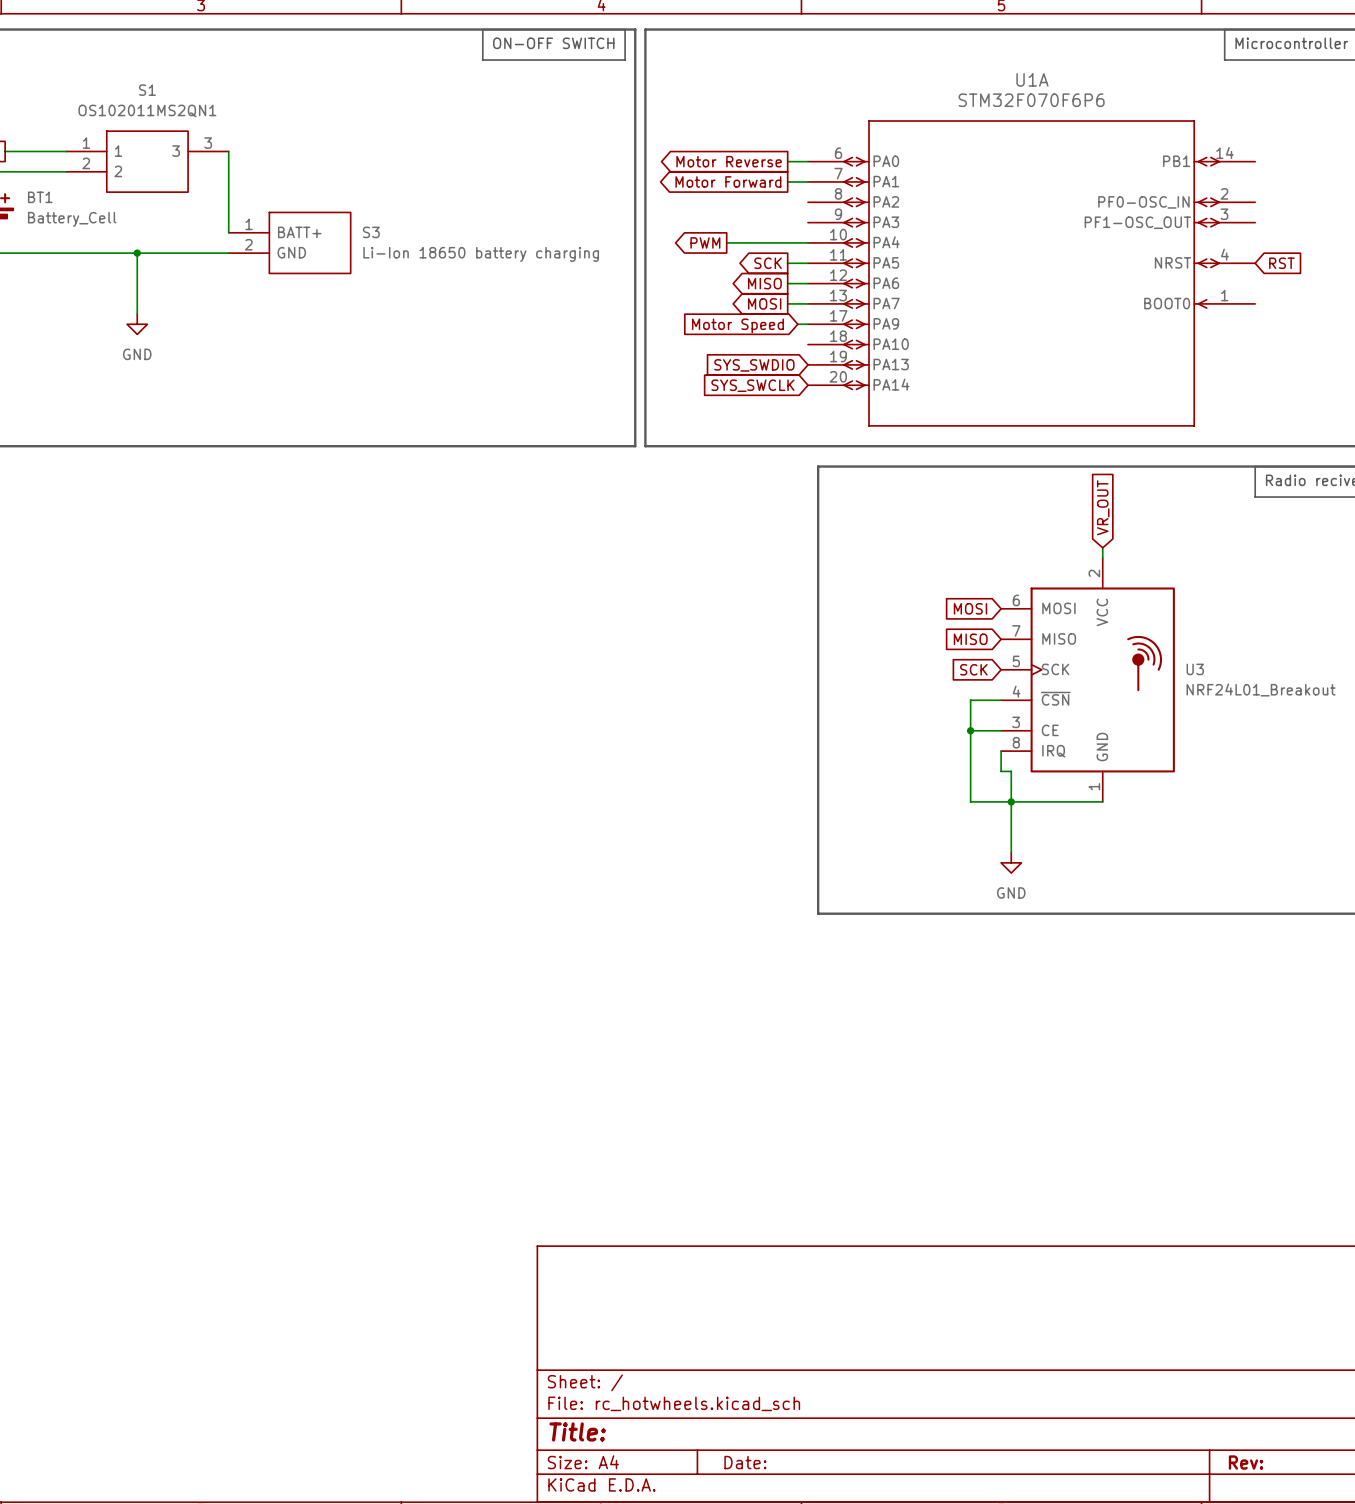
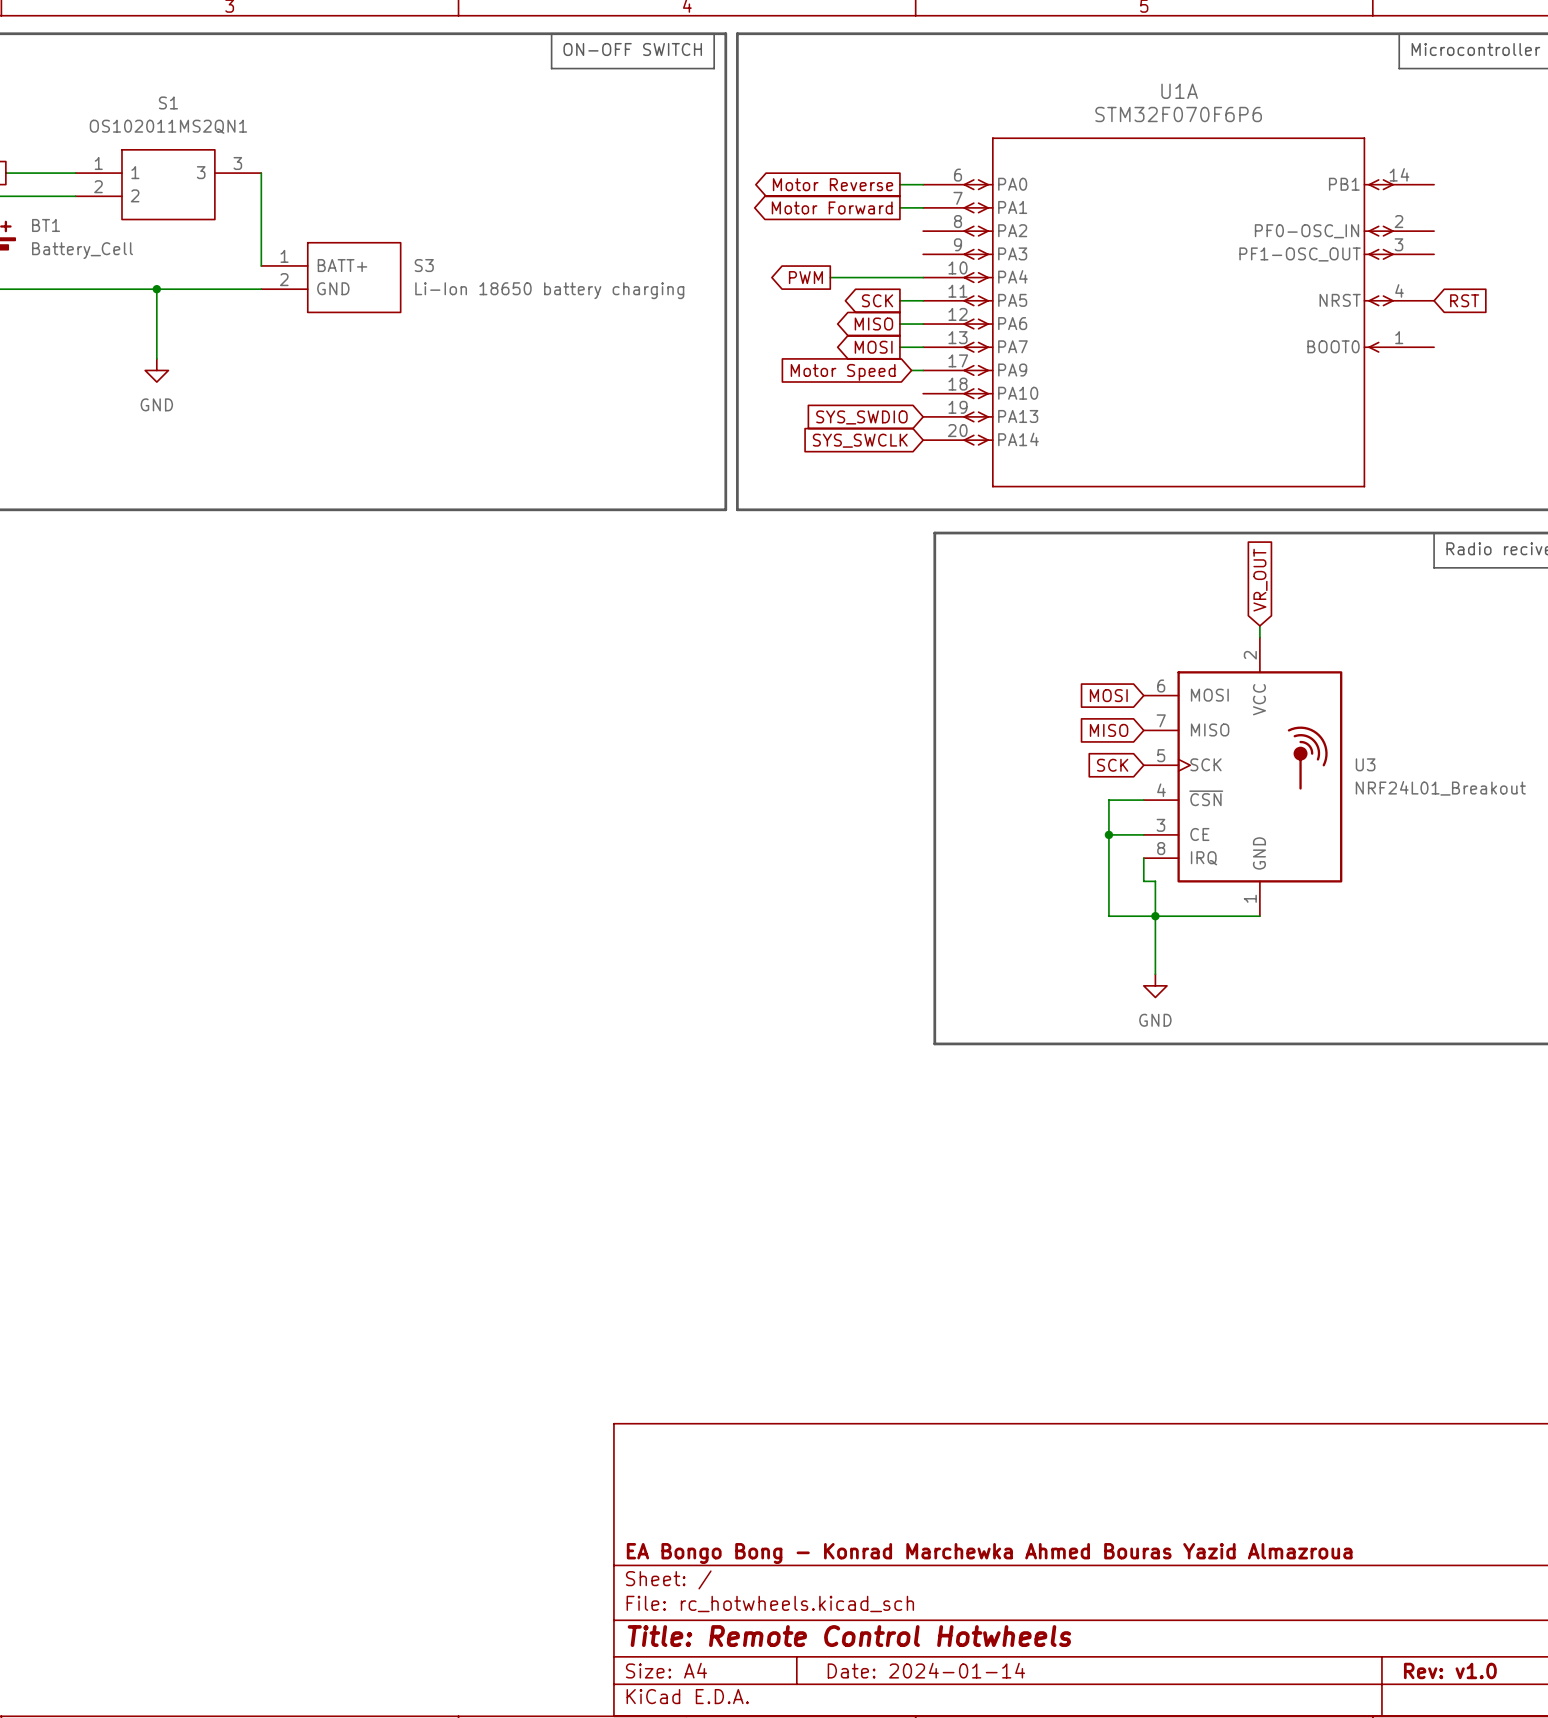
title block: none -> EA Bongo Bong - Konrad Marchewka Ahmed Bouras Yazid Almazroua (989, 1553)
title block: Title: (577, 1431) -> Title: Remote Control Hotwheels (849, 1636)
title block: Date: (745, 1462) -> Date: 2024-01-14 (926, 1670)
title block: Rev: (1246, 1462) -> Rev: v1.0 (1450, 1670)

